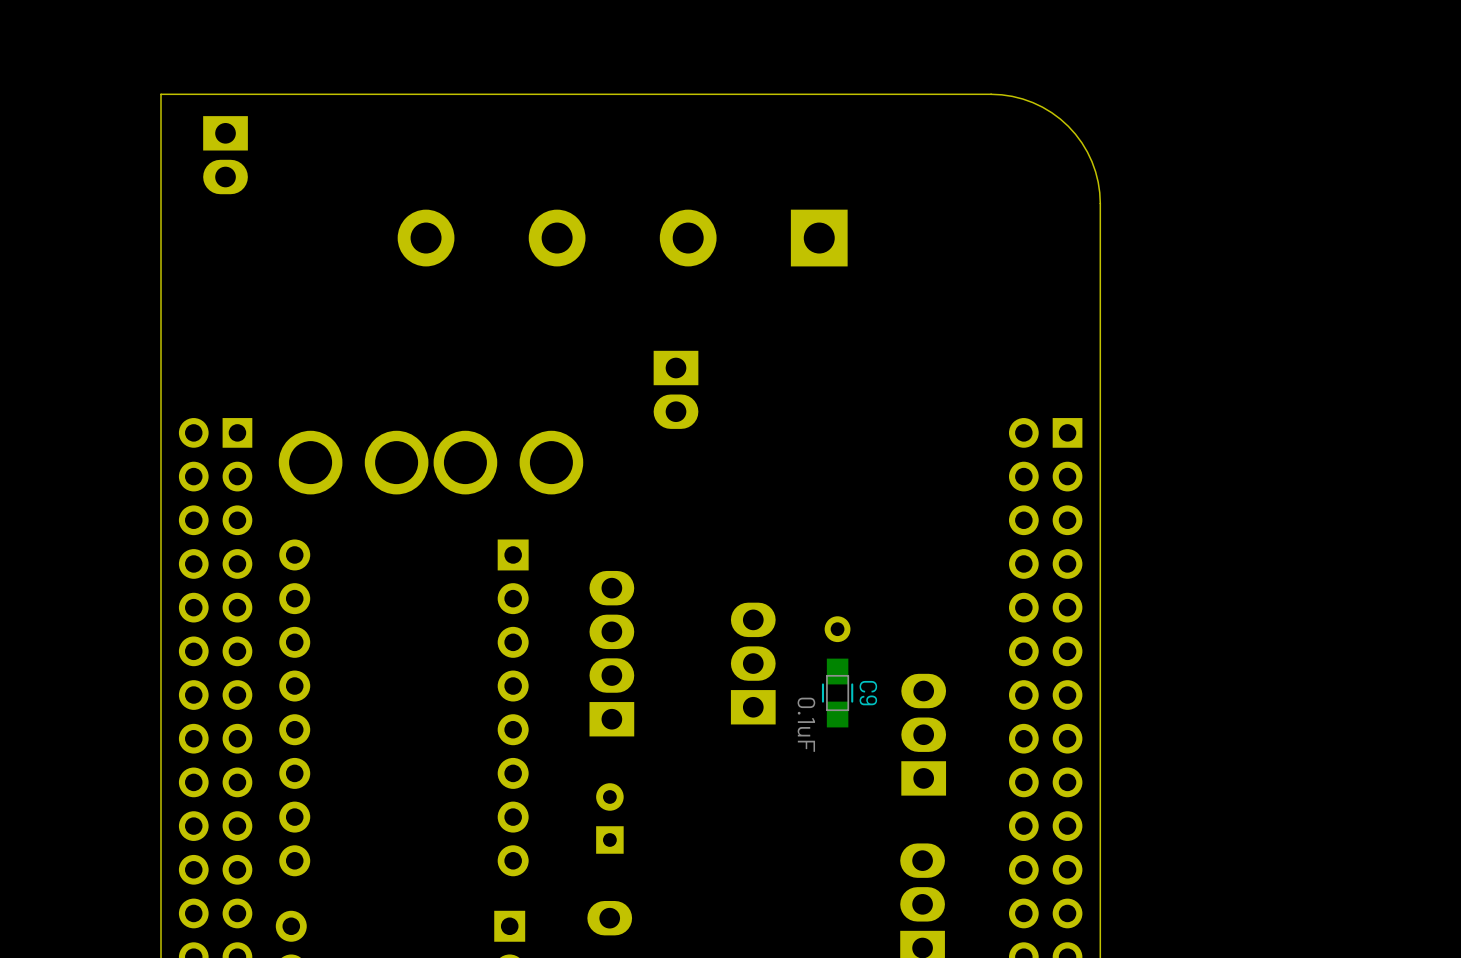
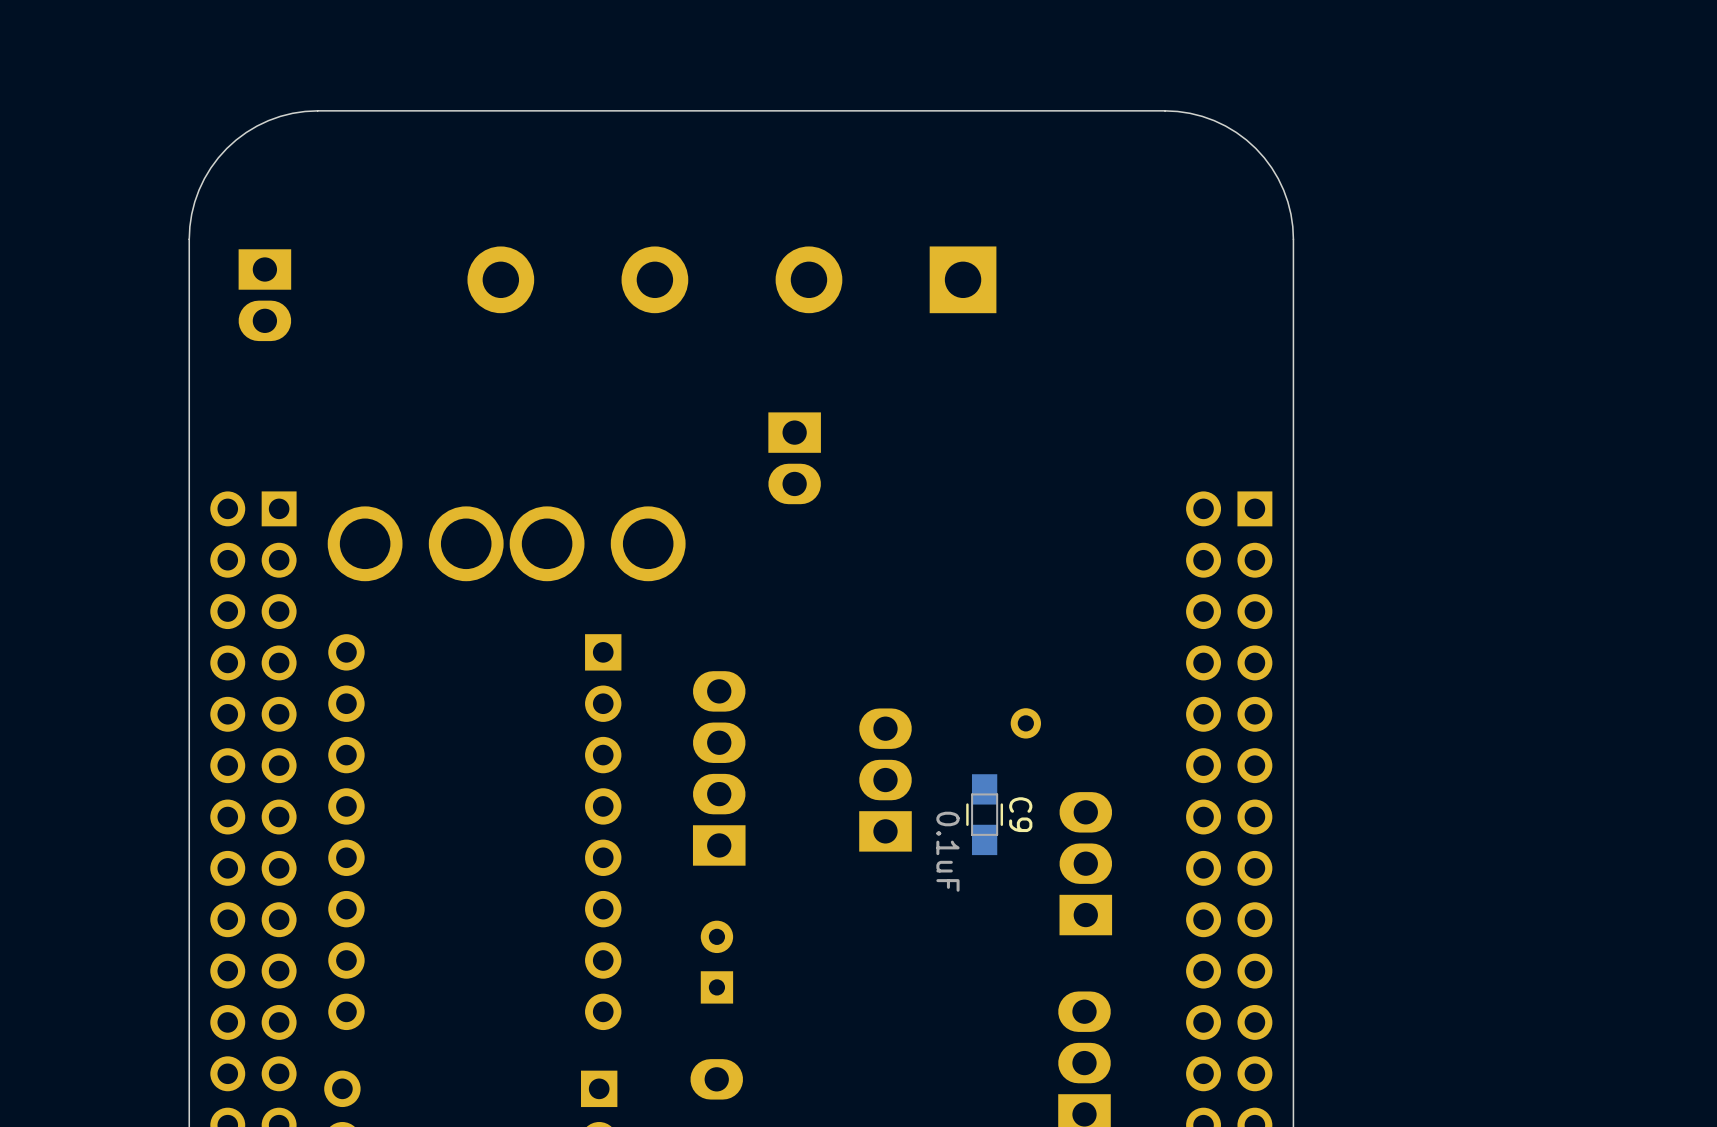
board edge: (270, 94) (160, 94) (160, 203) -> (317, 110) (292, 113) (268, 120) (246, 132) (226, 148) (210, 167) (199, 190) (191, 214) (189, 239)
part position: (225, 155) -> (264, 295)
part position: (837, 629) -> (1025, 723)

